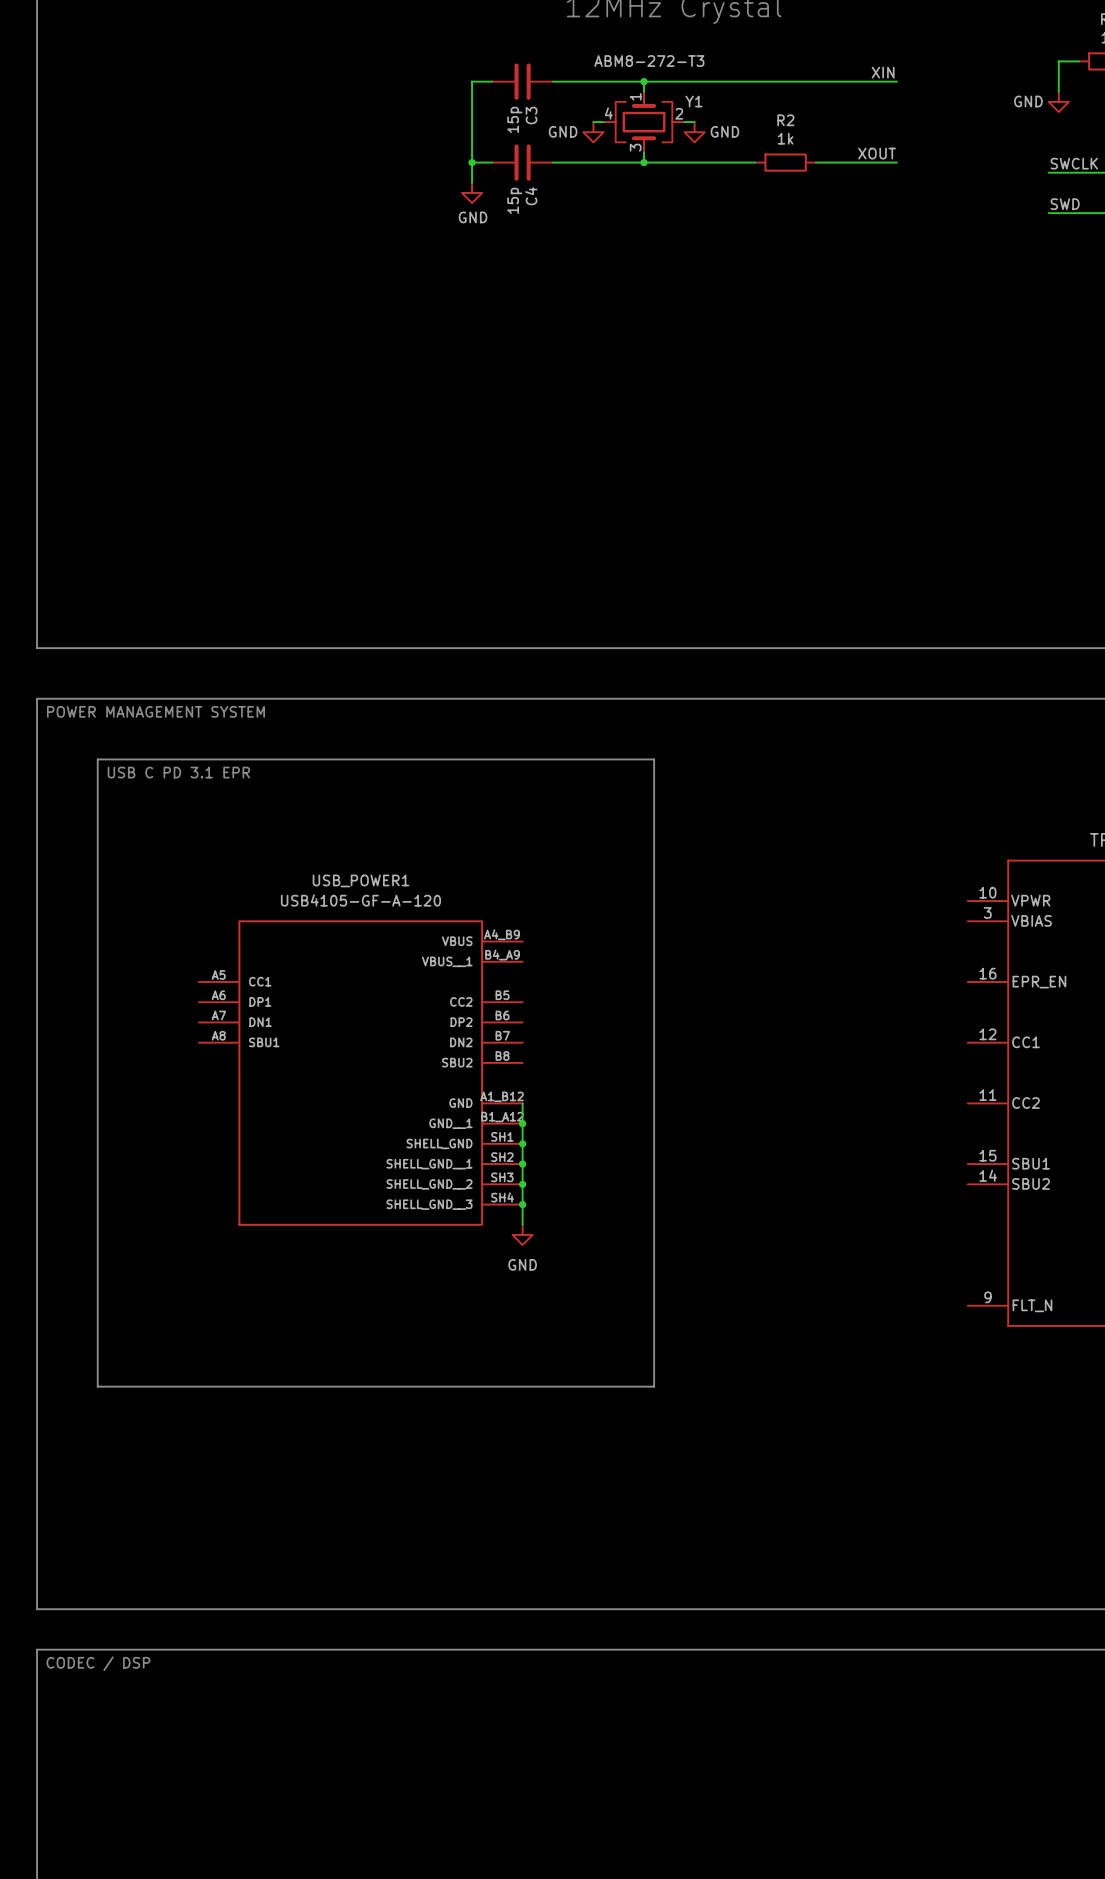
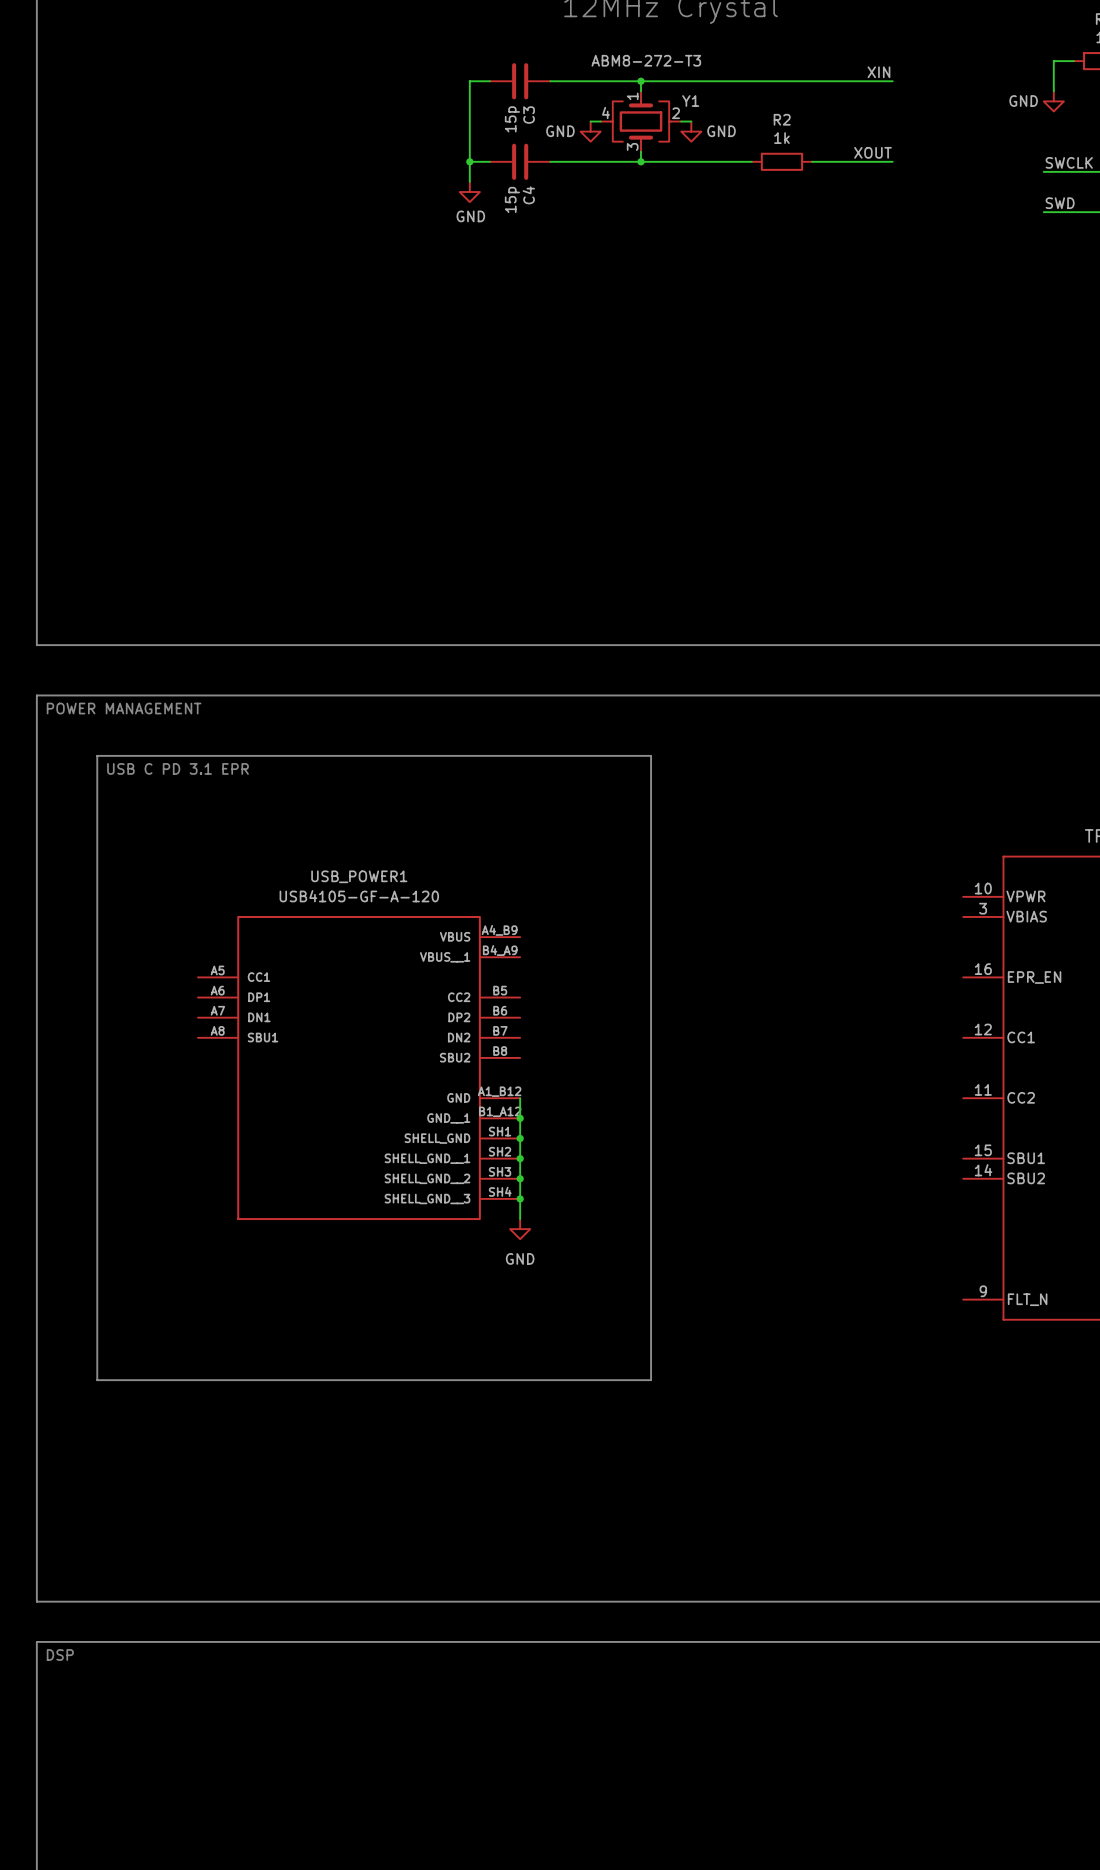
text: POWER MANAGEMENT SYSTEM (155, 711) -> POWER MANAGEMENT (124, 708)
text: CODEC / DSP (98, 1663) -> DSP (60, 1655)

